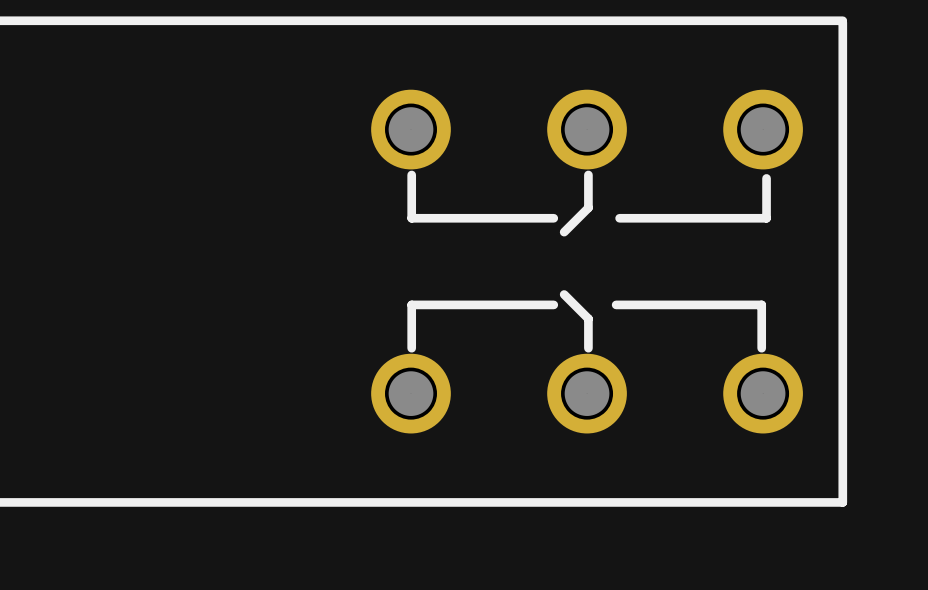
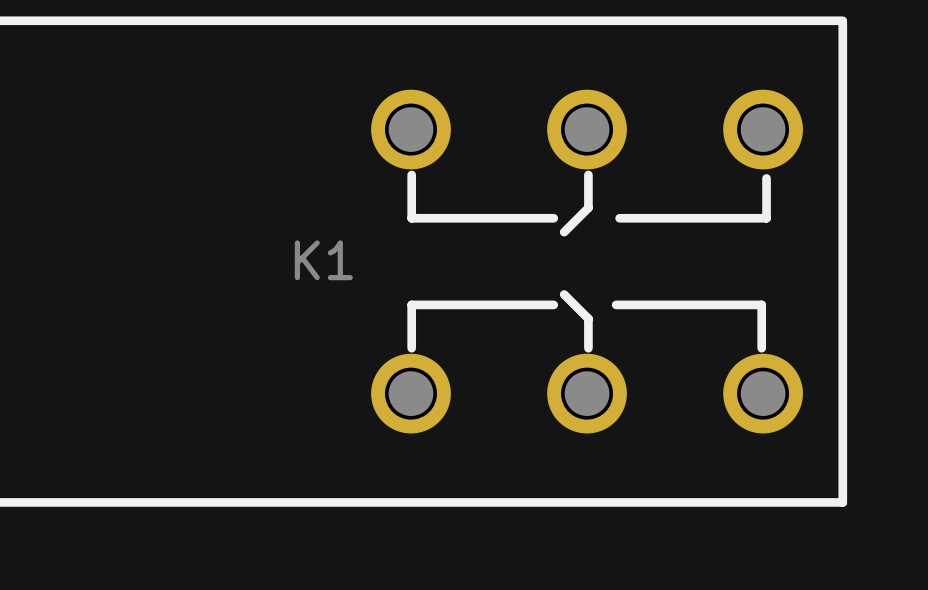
K1 name: none -> K1 (323, 260)

